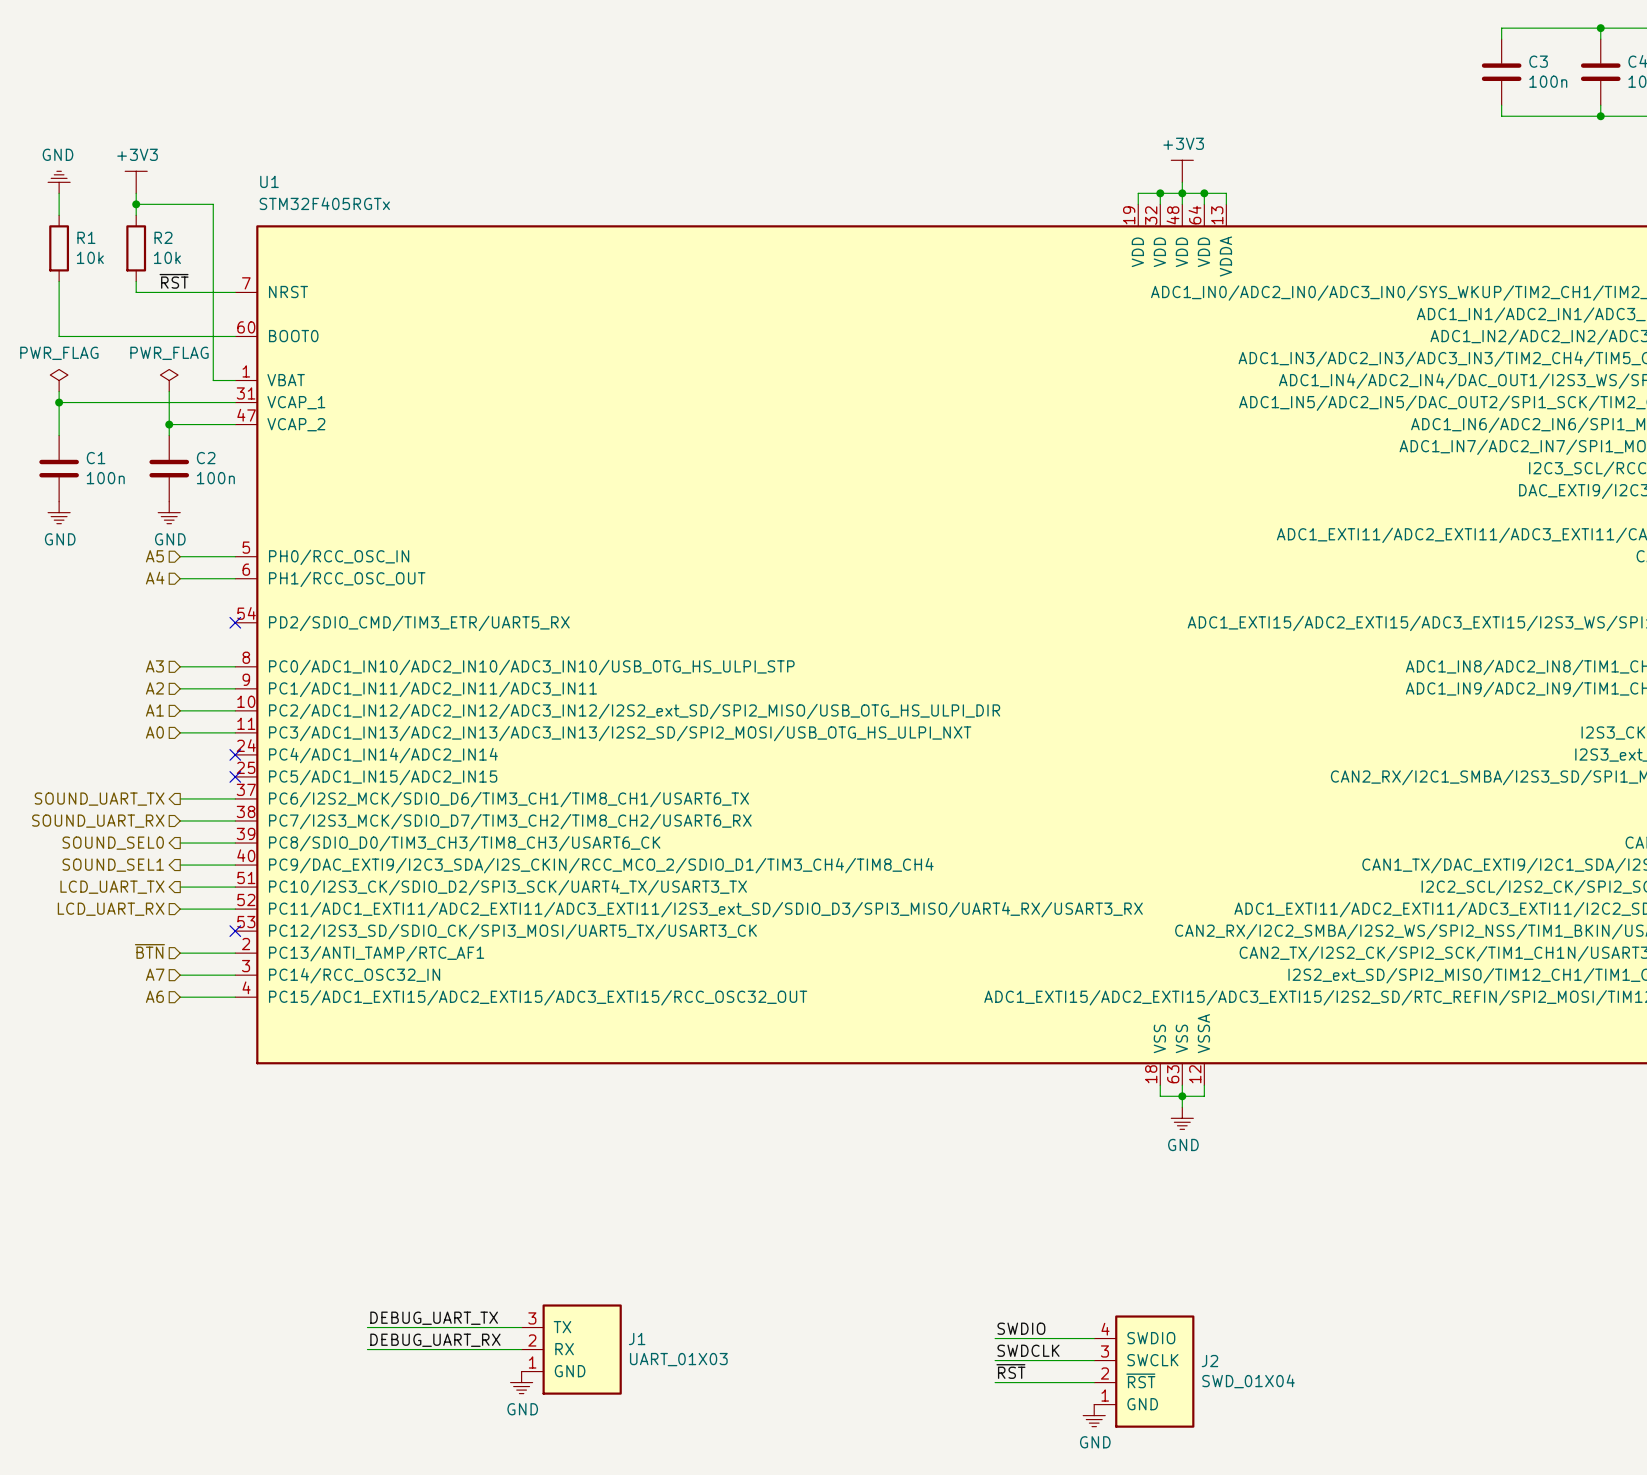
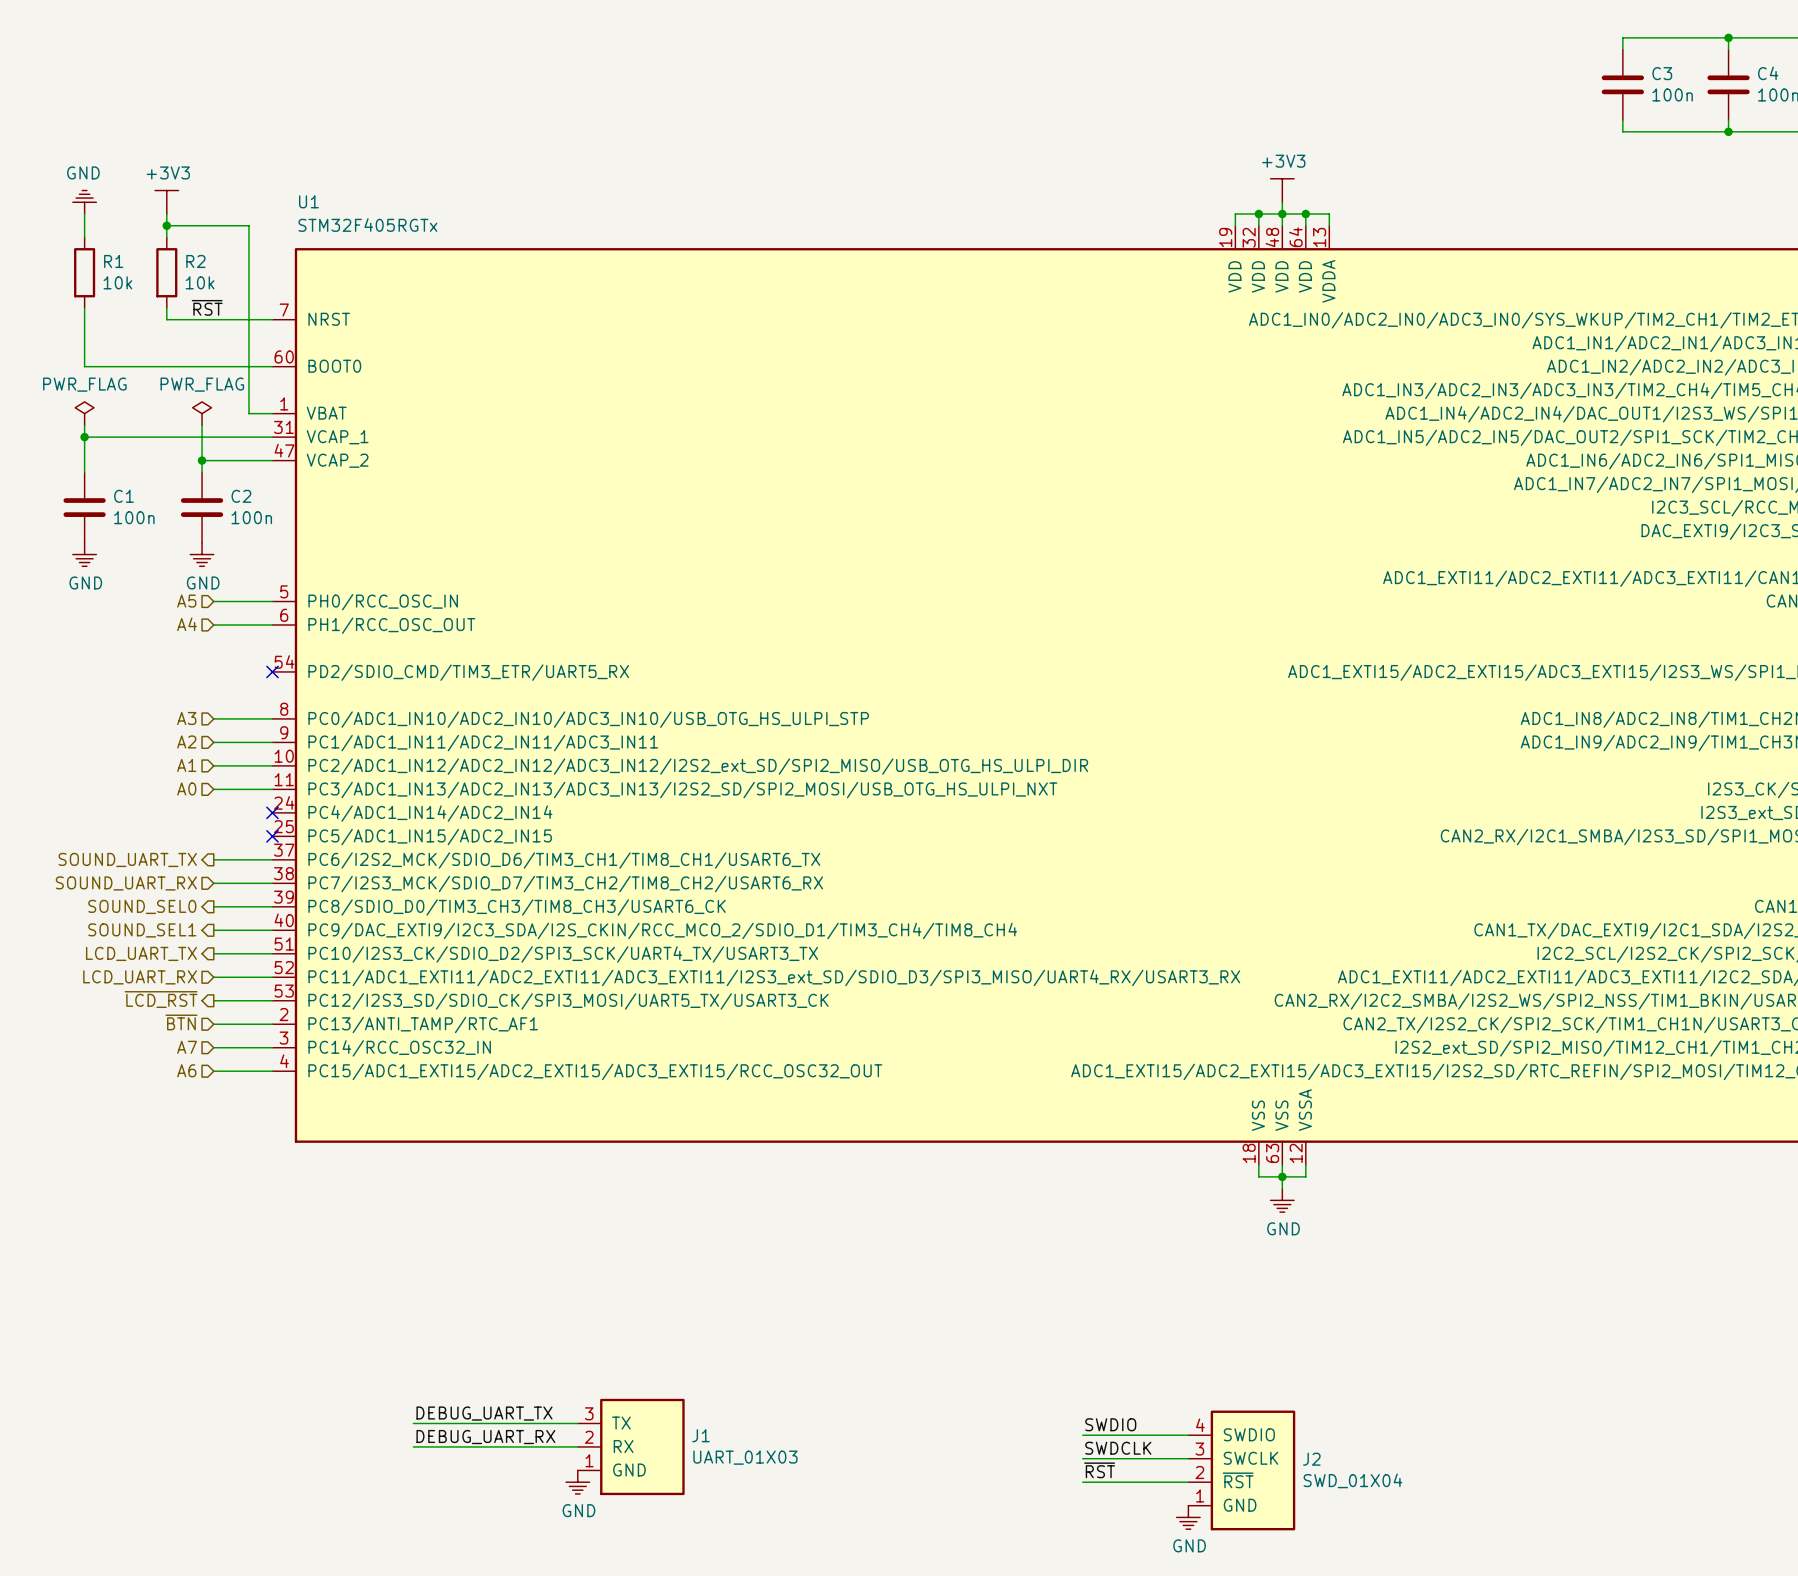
hierarchical label: none -> ~{LCD_RST} (161, 999)
wire: none -> (213, 1000) (272, 1000)
no-connect mark: (235, 931) -> none

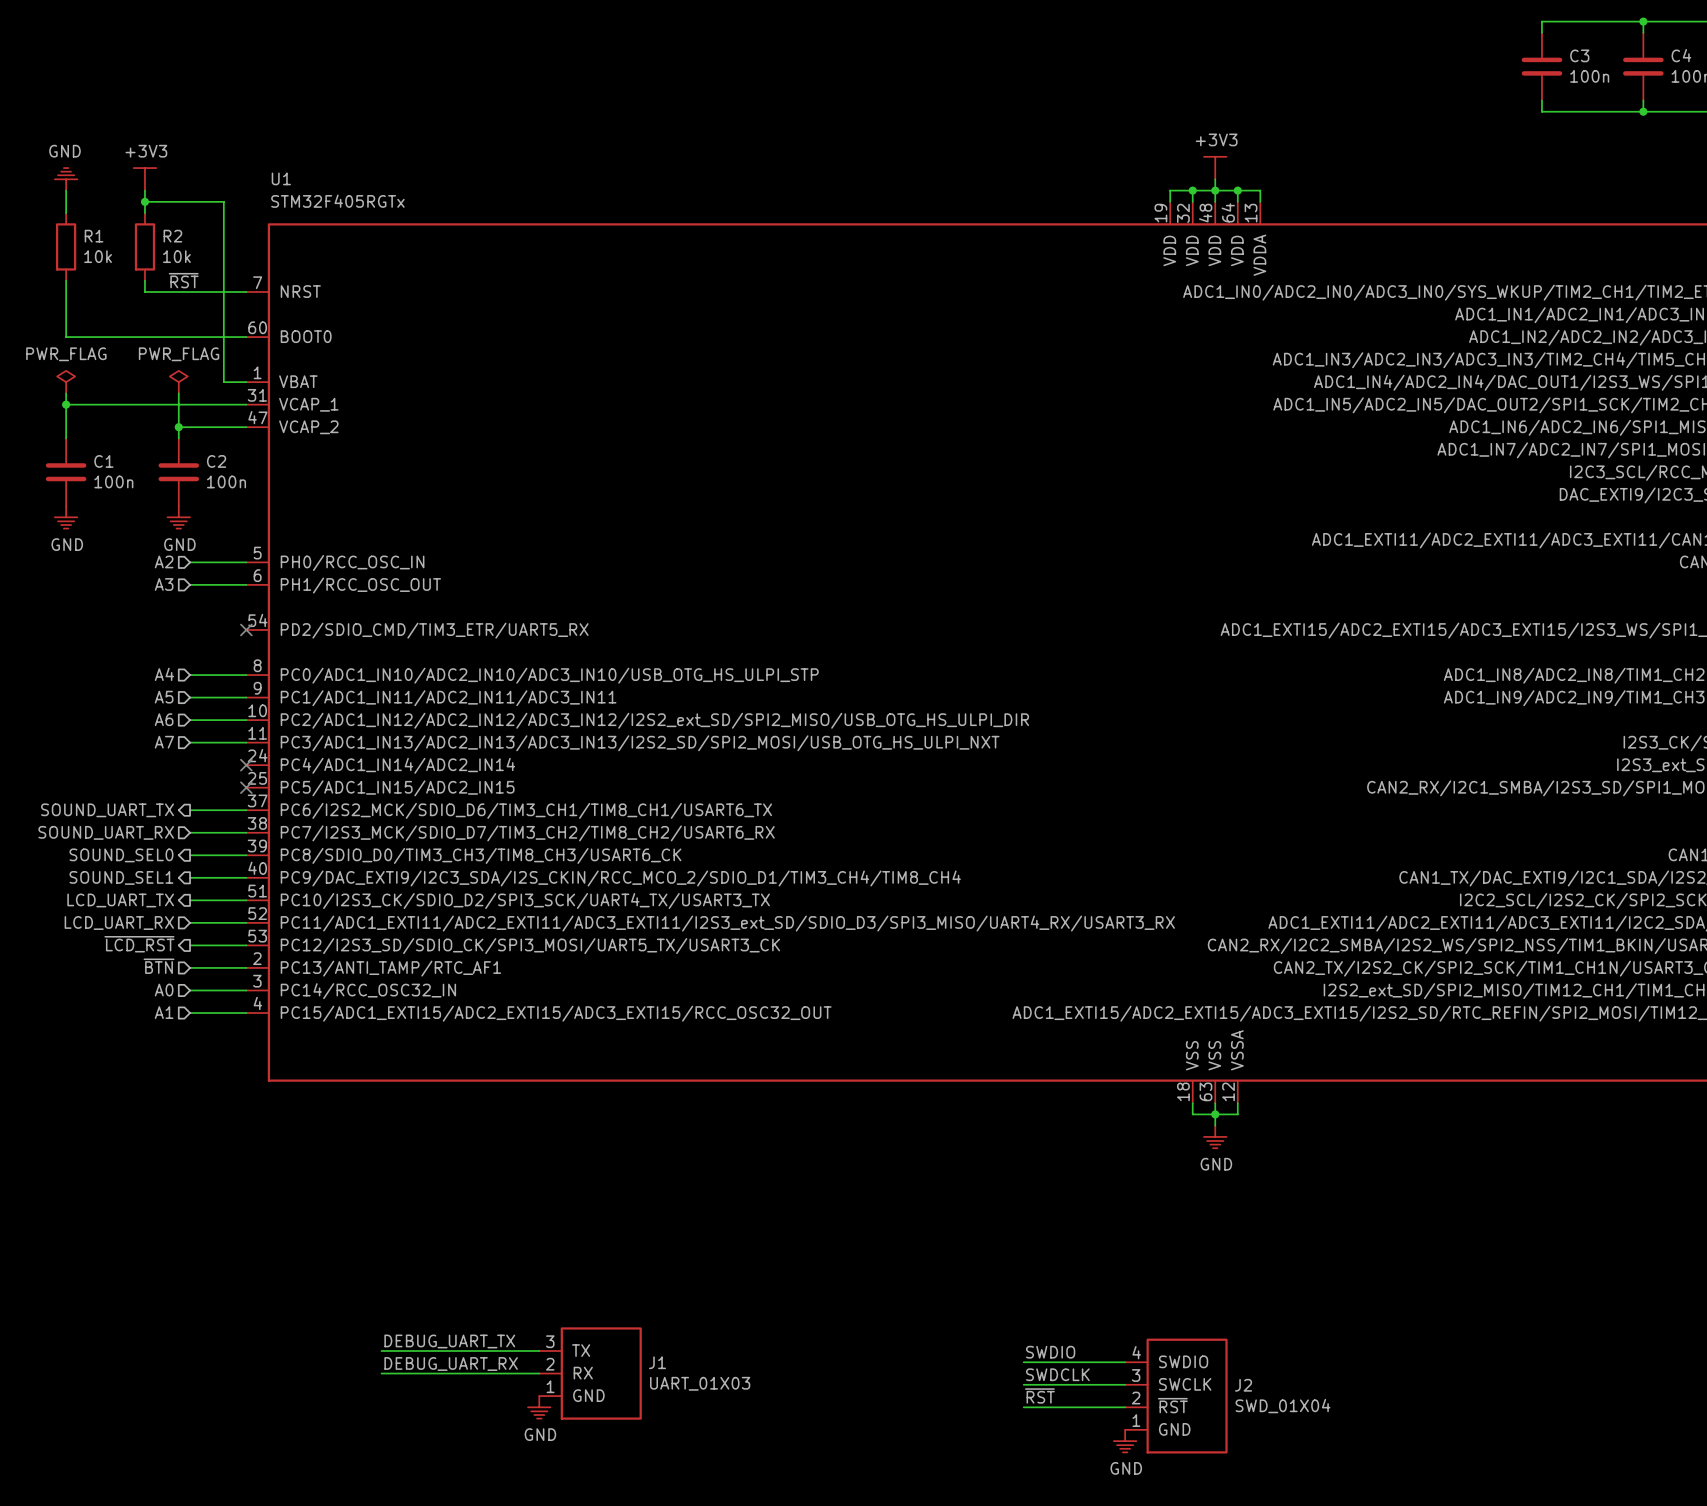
hierarchical label: A5 (186, 601) -> A2 (164, 561)
hierarchical label: A4 (187, 624) -> A3 (164, 584)
hierarchical label: A3 (186, 718) -> A4 (164, 674)
hierarchical label: A2 (186, 741) -> A5 (164, 697)
hierarchical label: A1 (186, 765) -> A6 (164, 719)
hierarchical label: A0 (186, 788) -> A7 (164, 742)
hierarchical label: A7 (187, 1047) -> A0 (164, 990)
hierarchical label: A6 (186, 1070) -> A1 (164, 1012)

